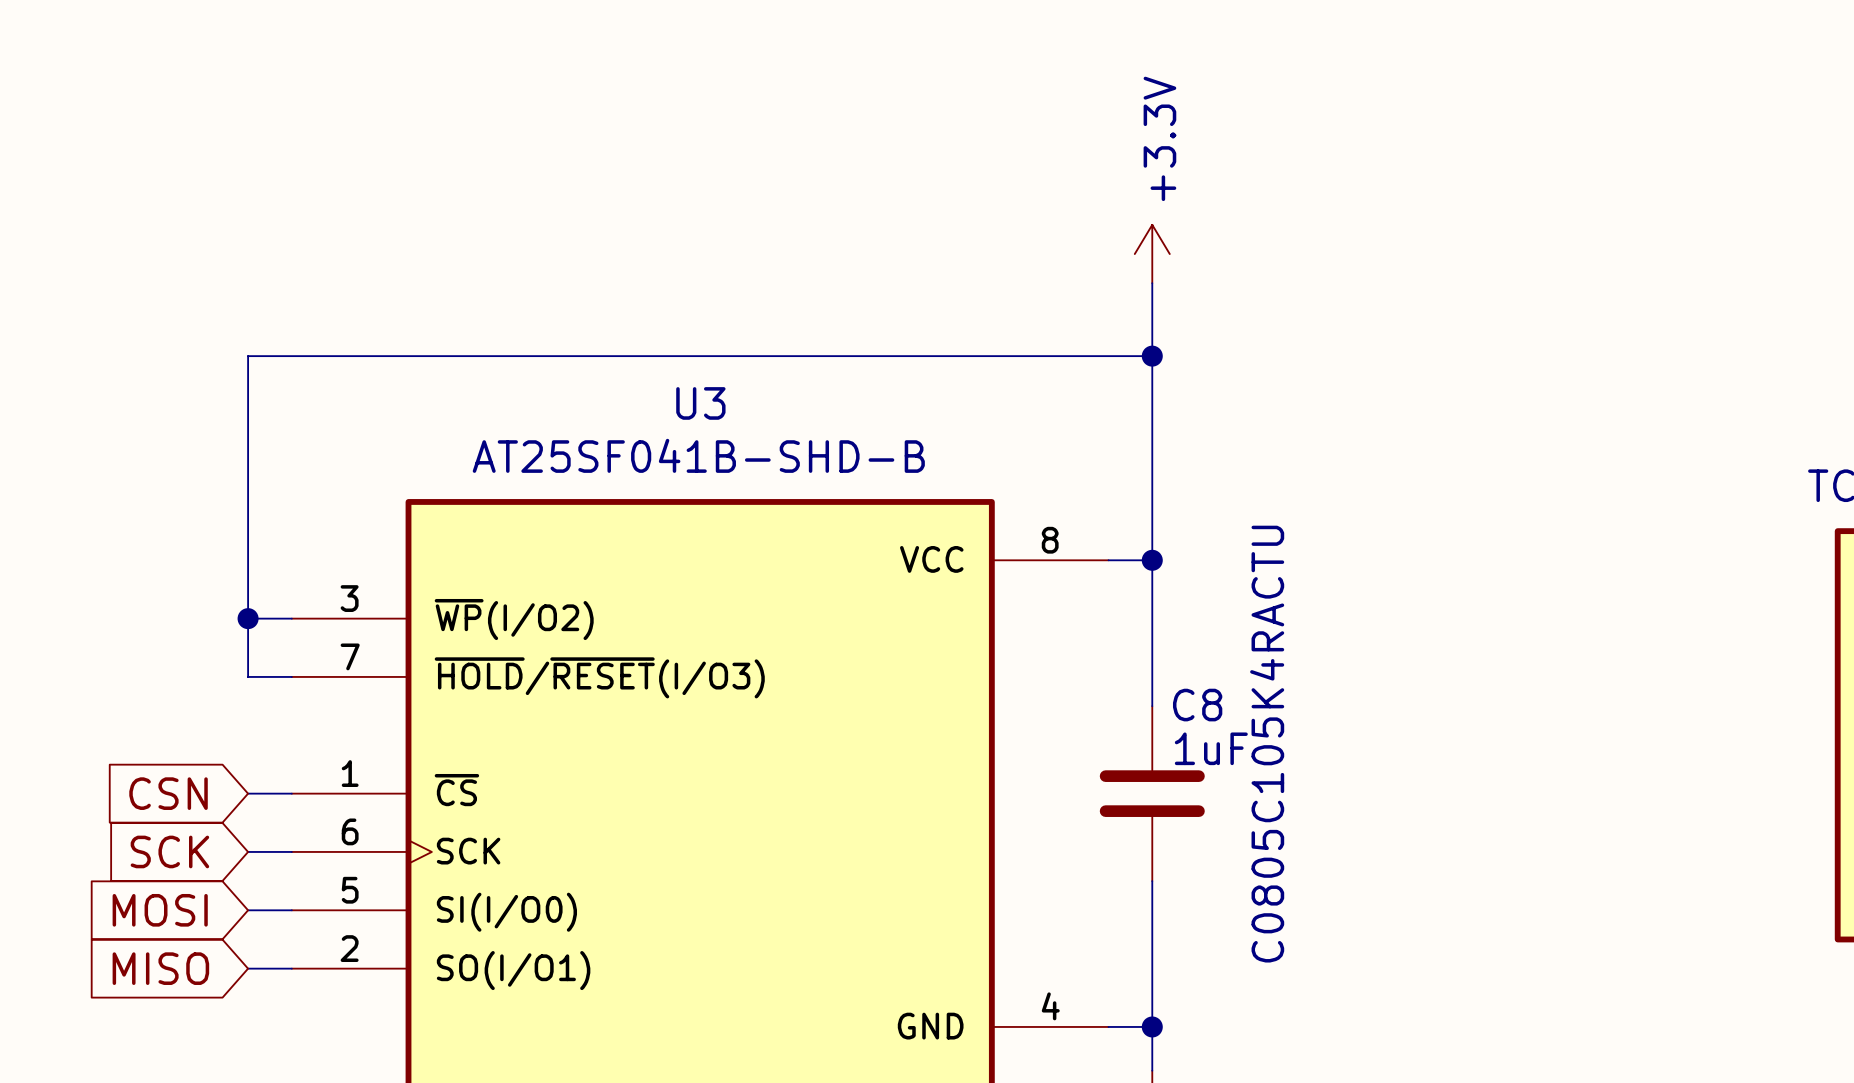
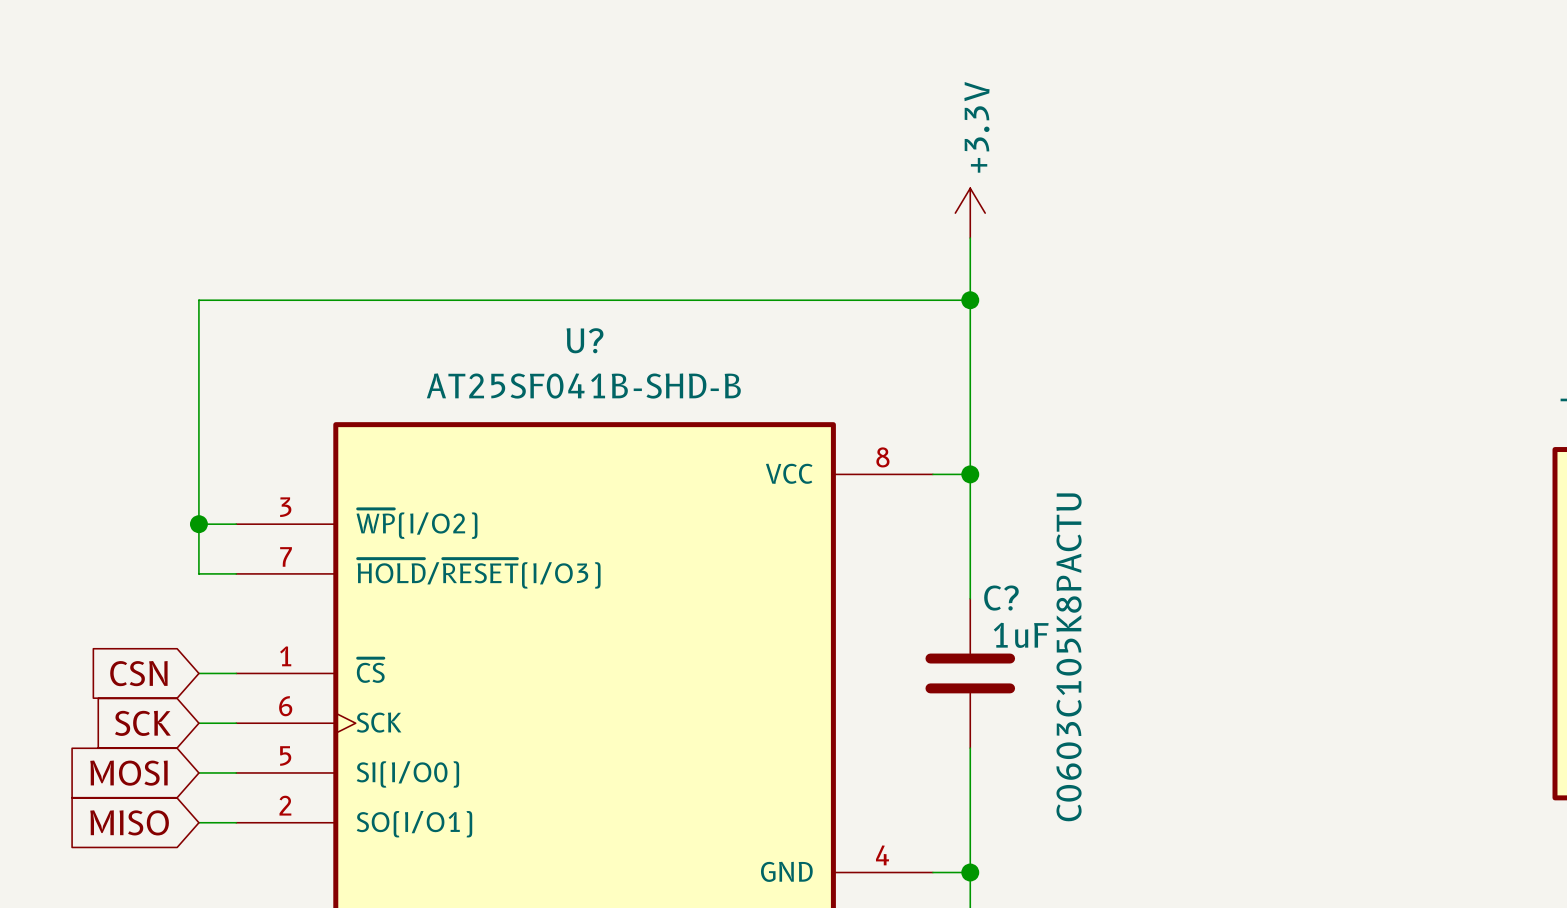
U3 name: U3 (700, 403) -> U? (585, 340)
C8 name: C8 (1197, 705) -> C? (1001, 598)
C8 value: C0805C105K4RACTU (1267, 744) -> C0603C105K8PACTU (1069, 657)

